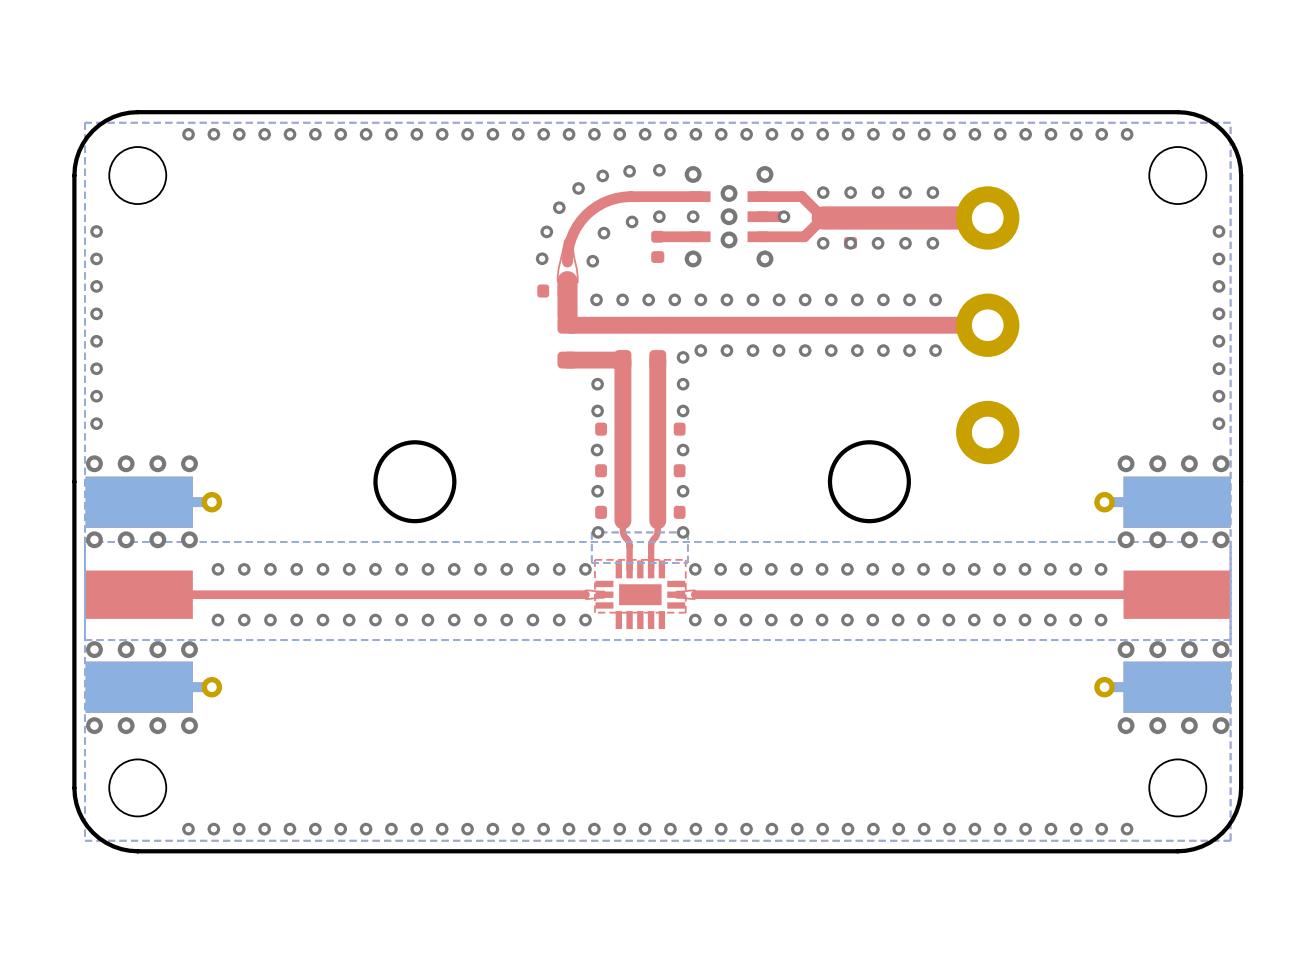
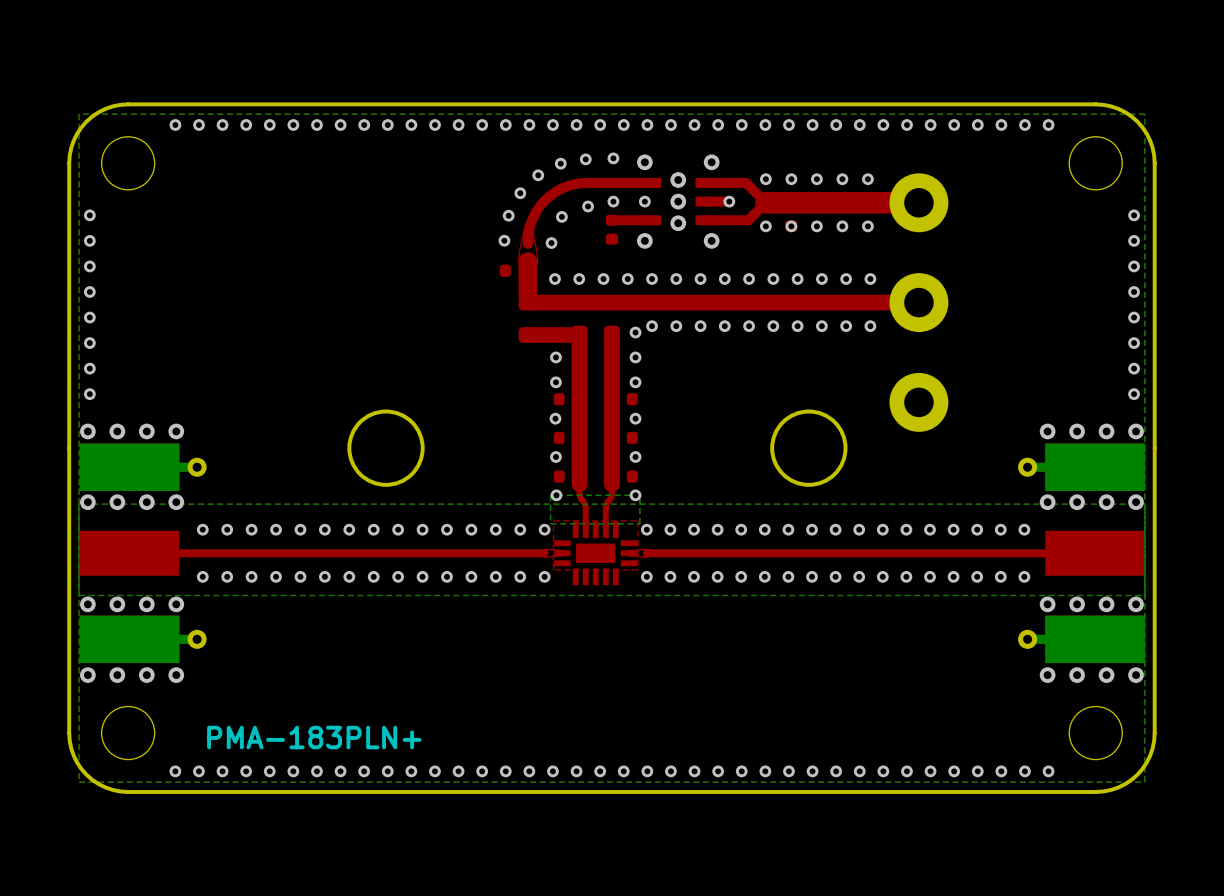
text: none -> PMA-183PLN+ (314, 737)

